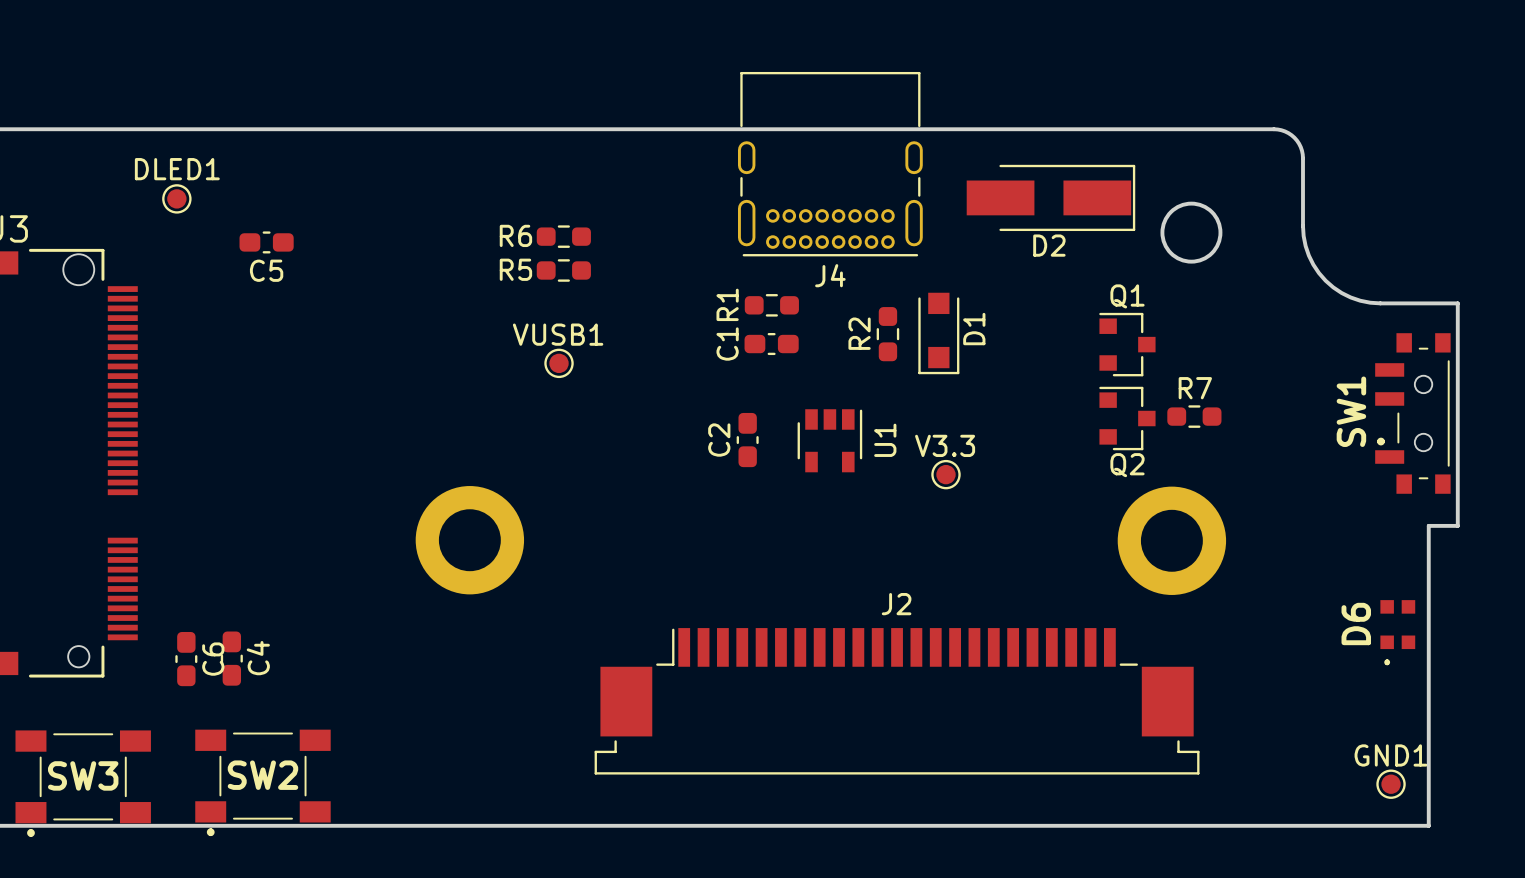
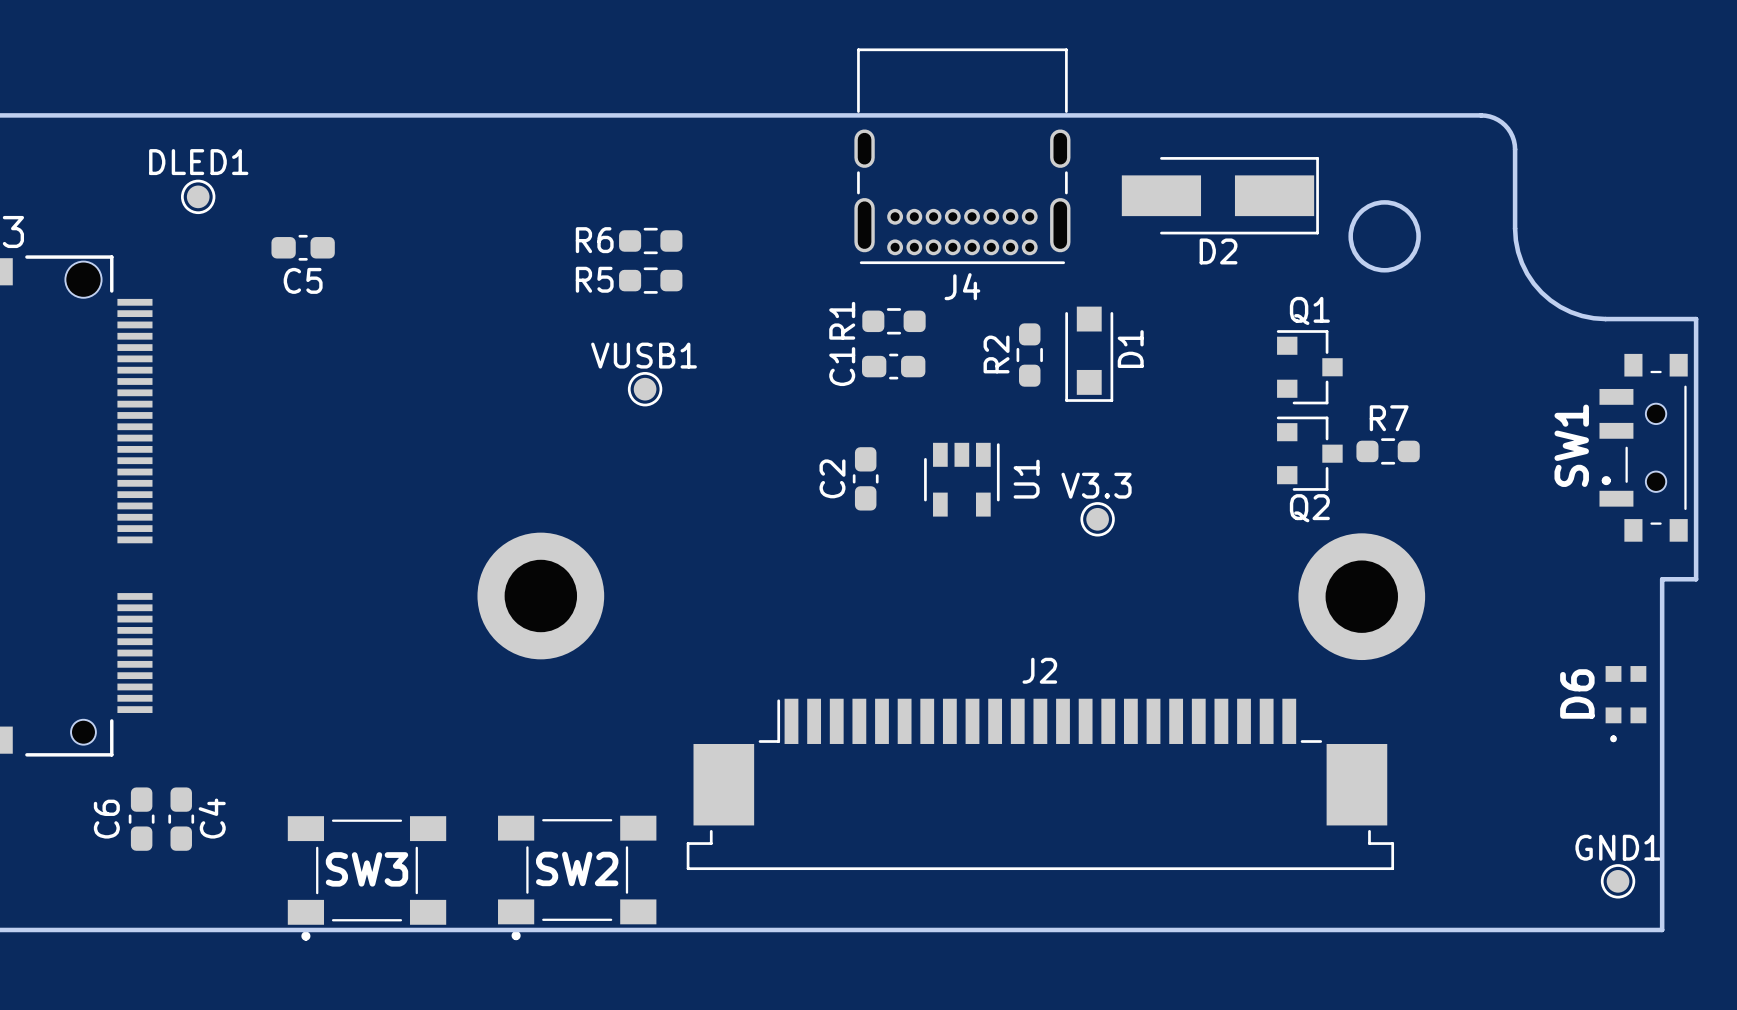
C4 position: (231, 658) -> (181, 819)
C6 position: (186, 659) -> (141, 819)
C6 name position: C6 (213, 659) -> C6 (106, 819)
SW2 position: (262, 782) -> (577, 877)
SW3 position: (83, 783) -> (367, 878)

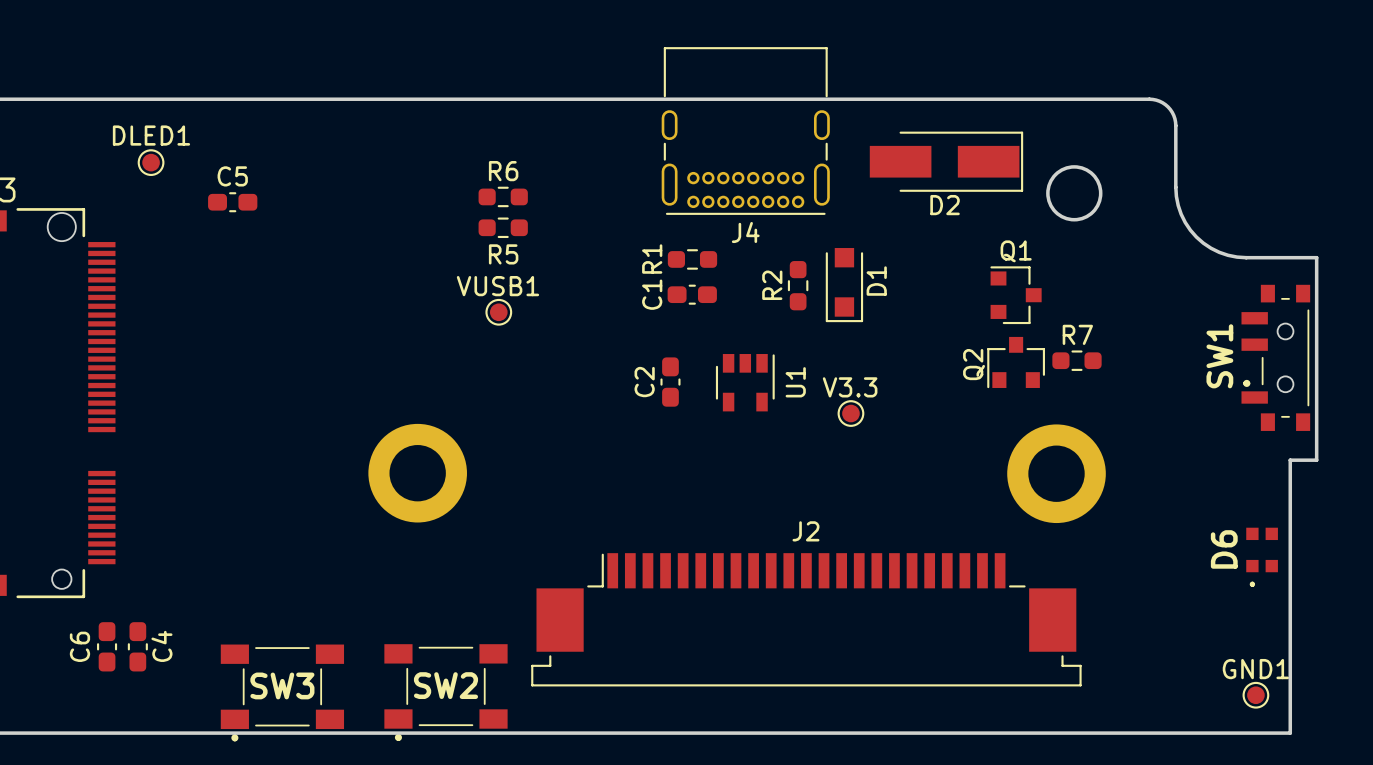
R6 name position: R6 (594, 240) -> R6 (503, 171)
R5 name position: R5 (594, 279) -> R5 (503, 254)
C5 name position: C5 (303, 280) -> C5 (232, 176)
Q2 rotation: 0° (1309, 453) -> 90° counterclockwise (1016, 362)
Q2 name position: Q2 (1309, 508) -> Q2 (974, 364)

